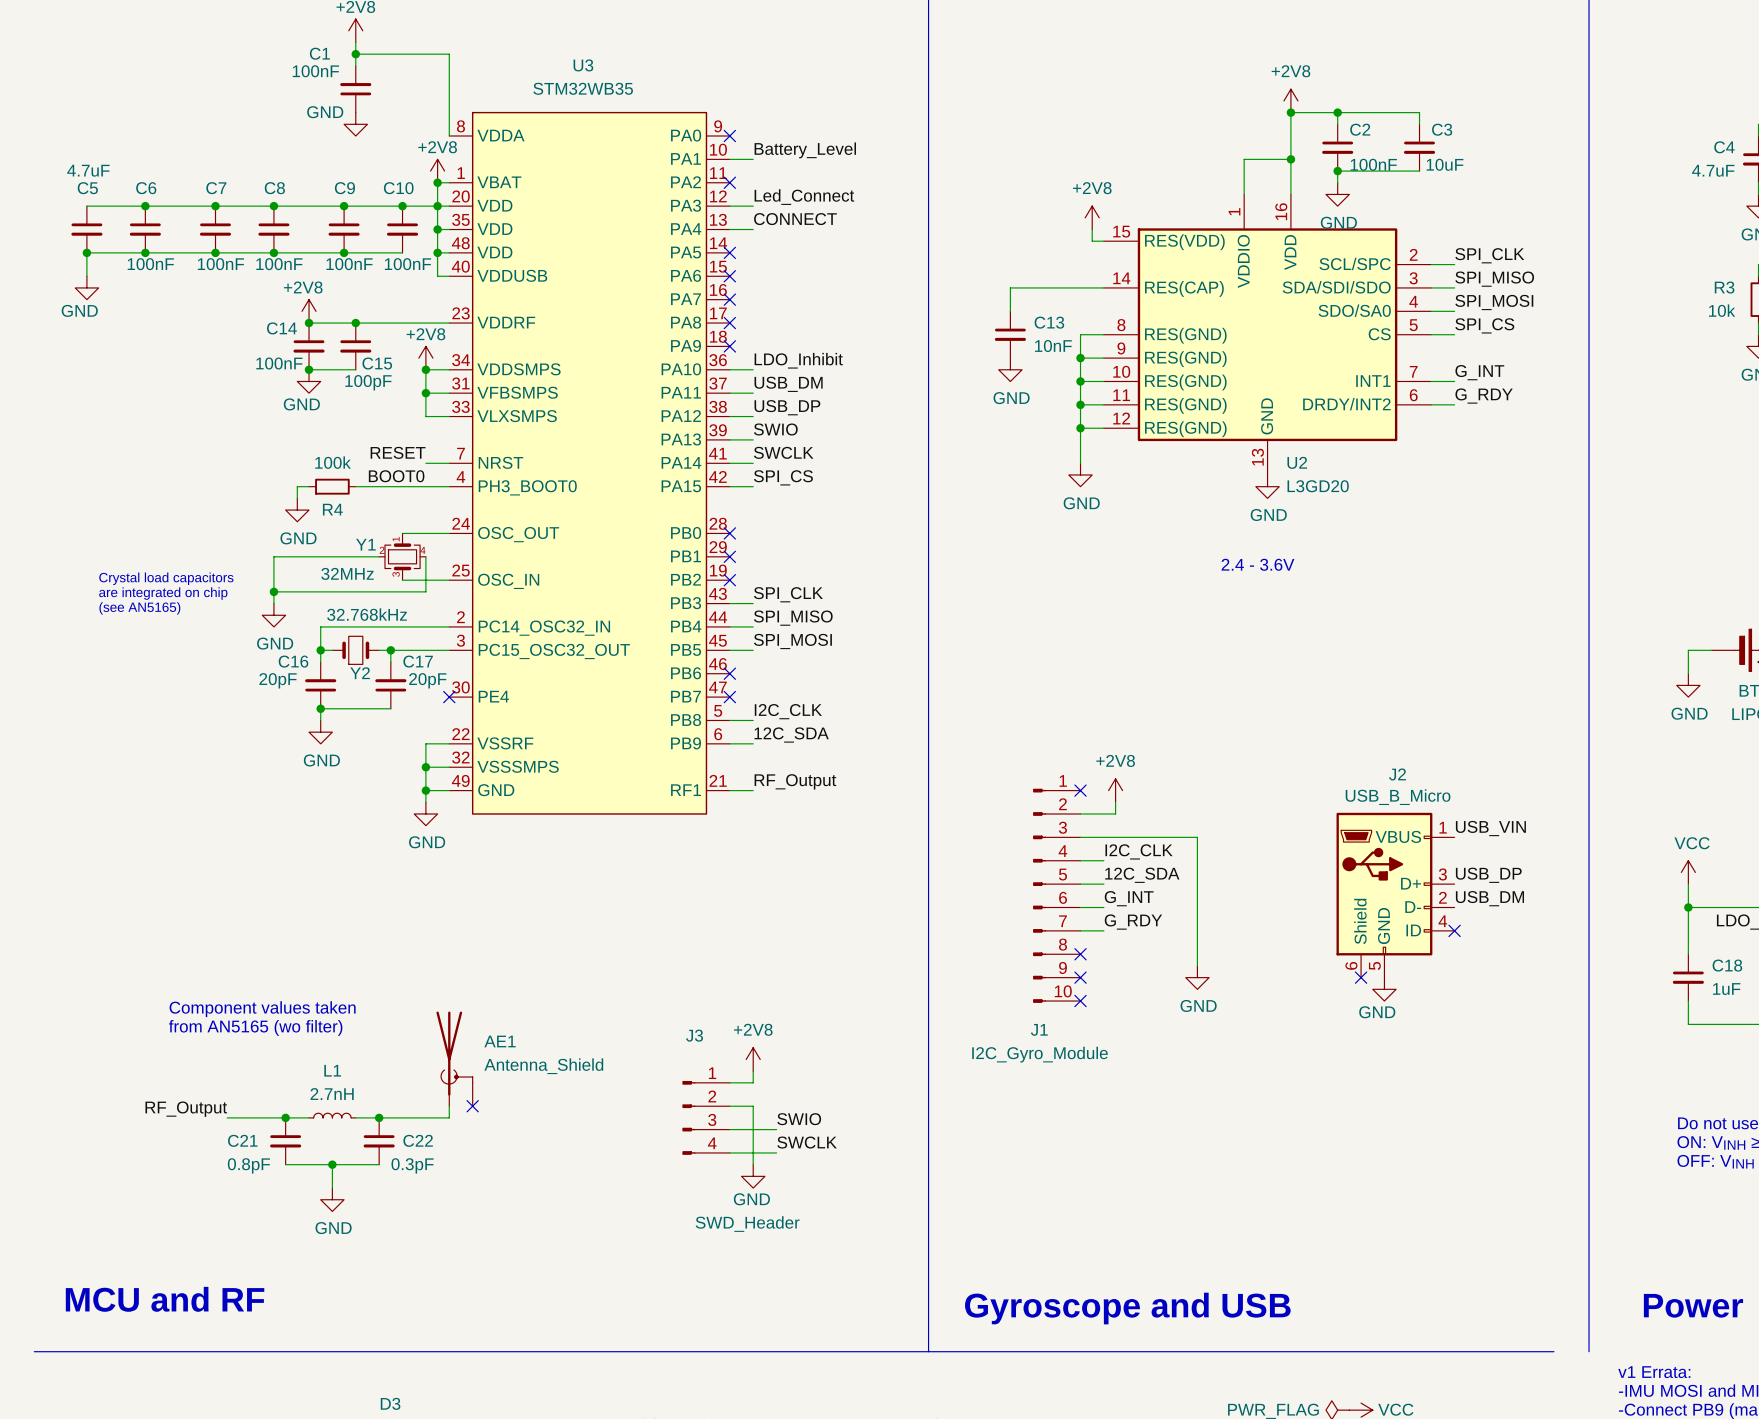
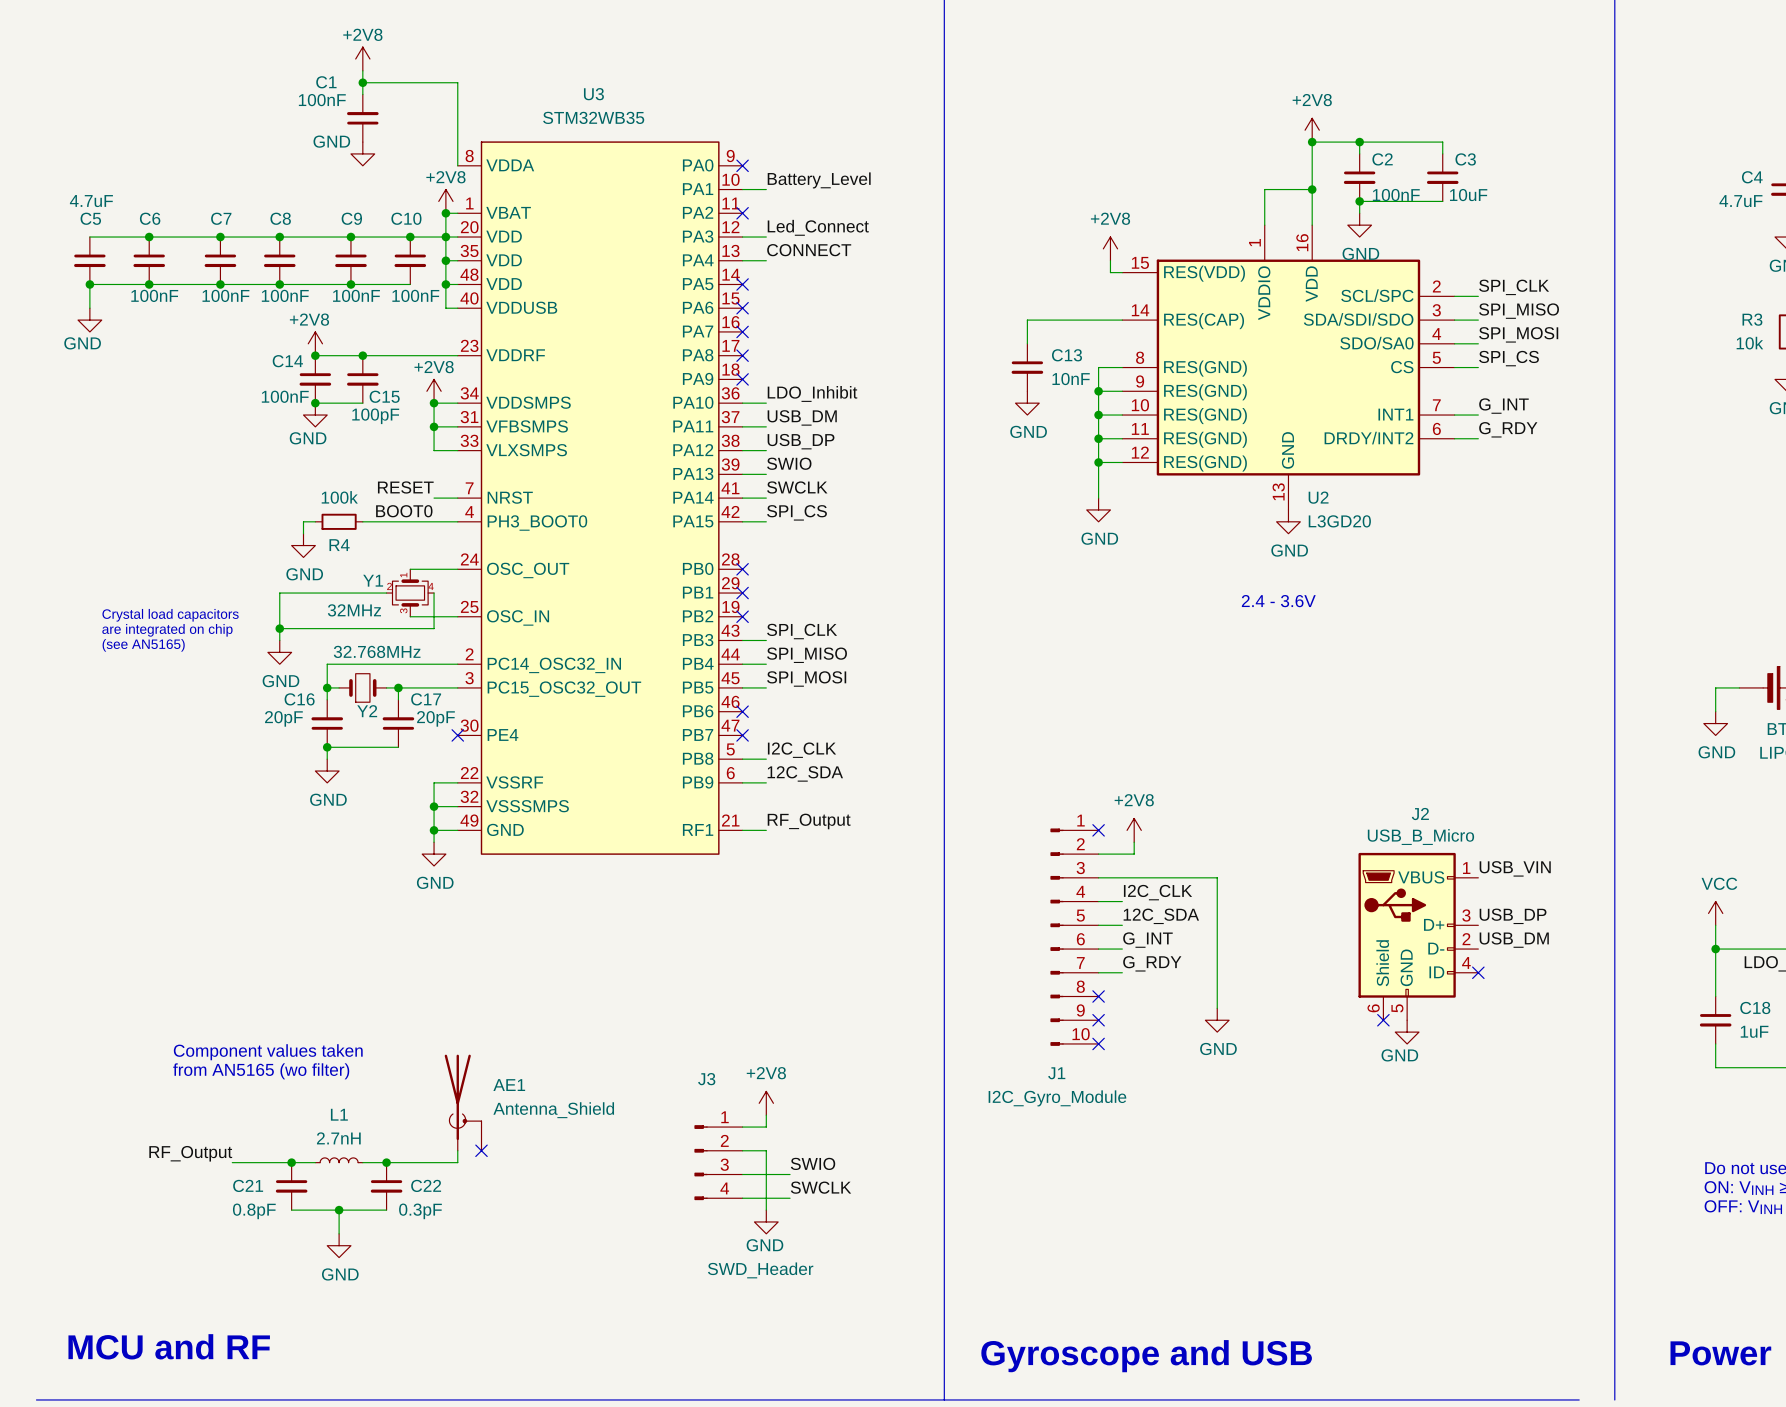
Y2 value: 32.768kHz (367, 614) -> 32.768MHz (377, 651)

